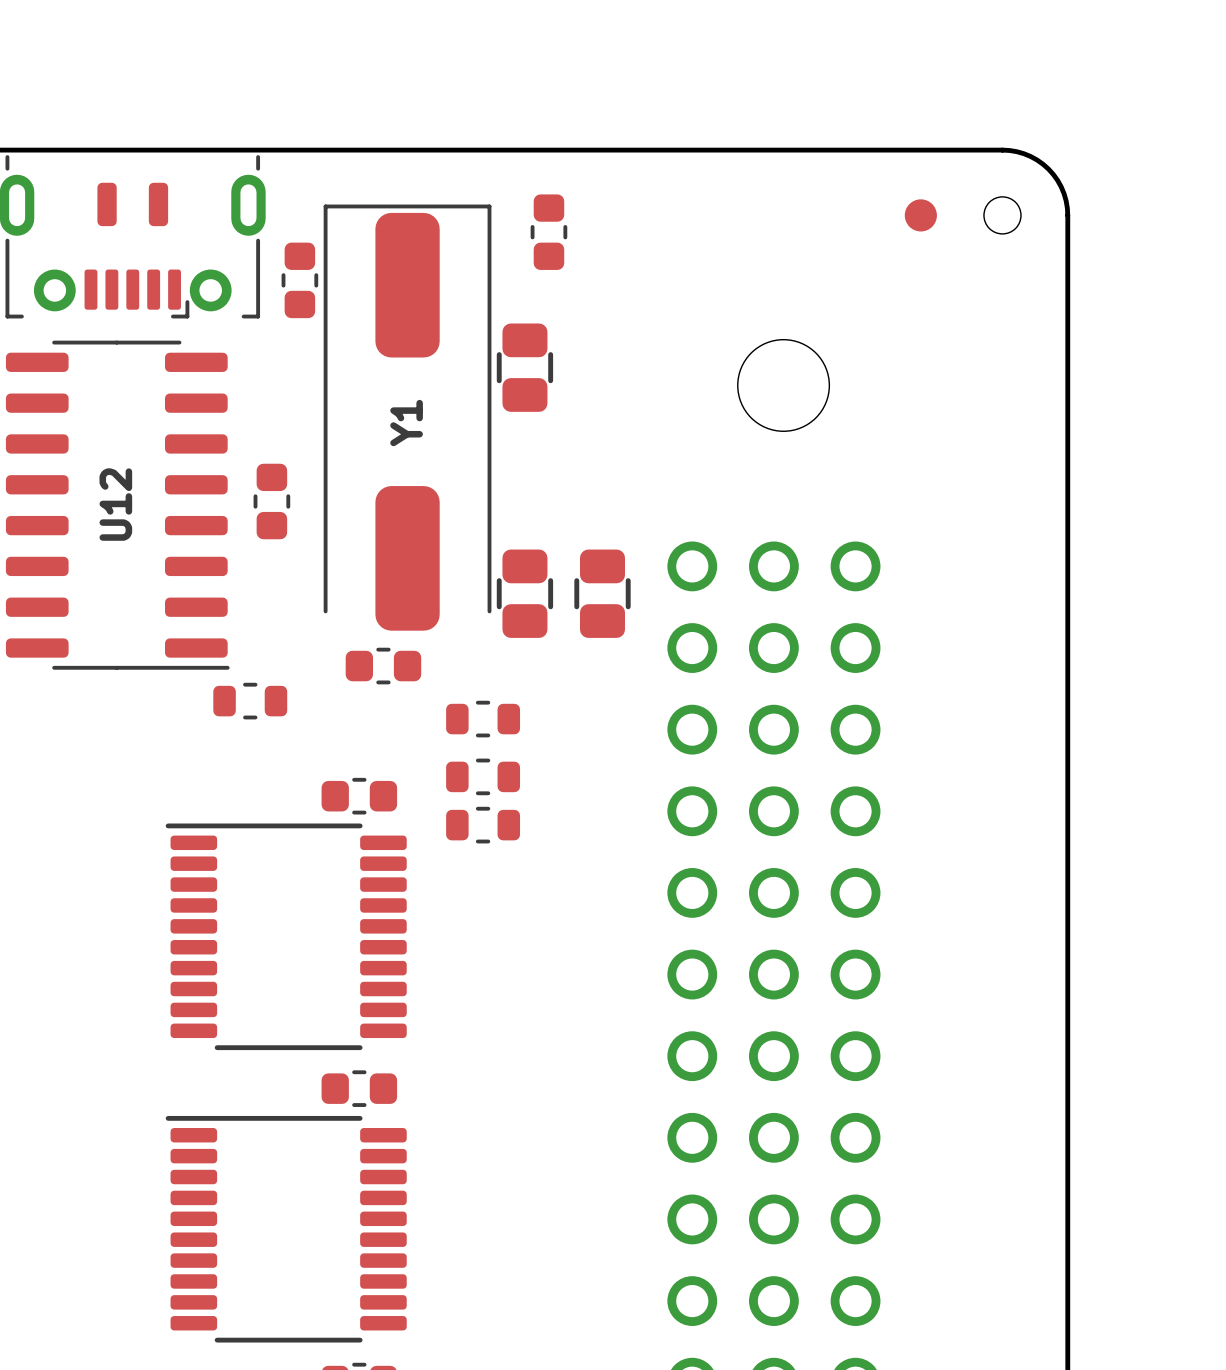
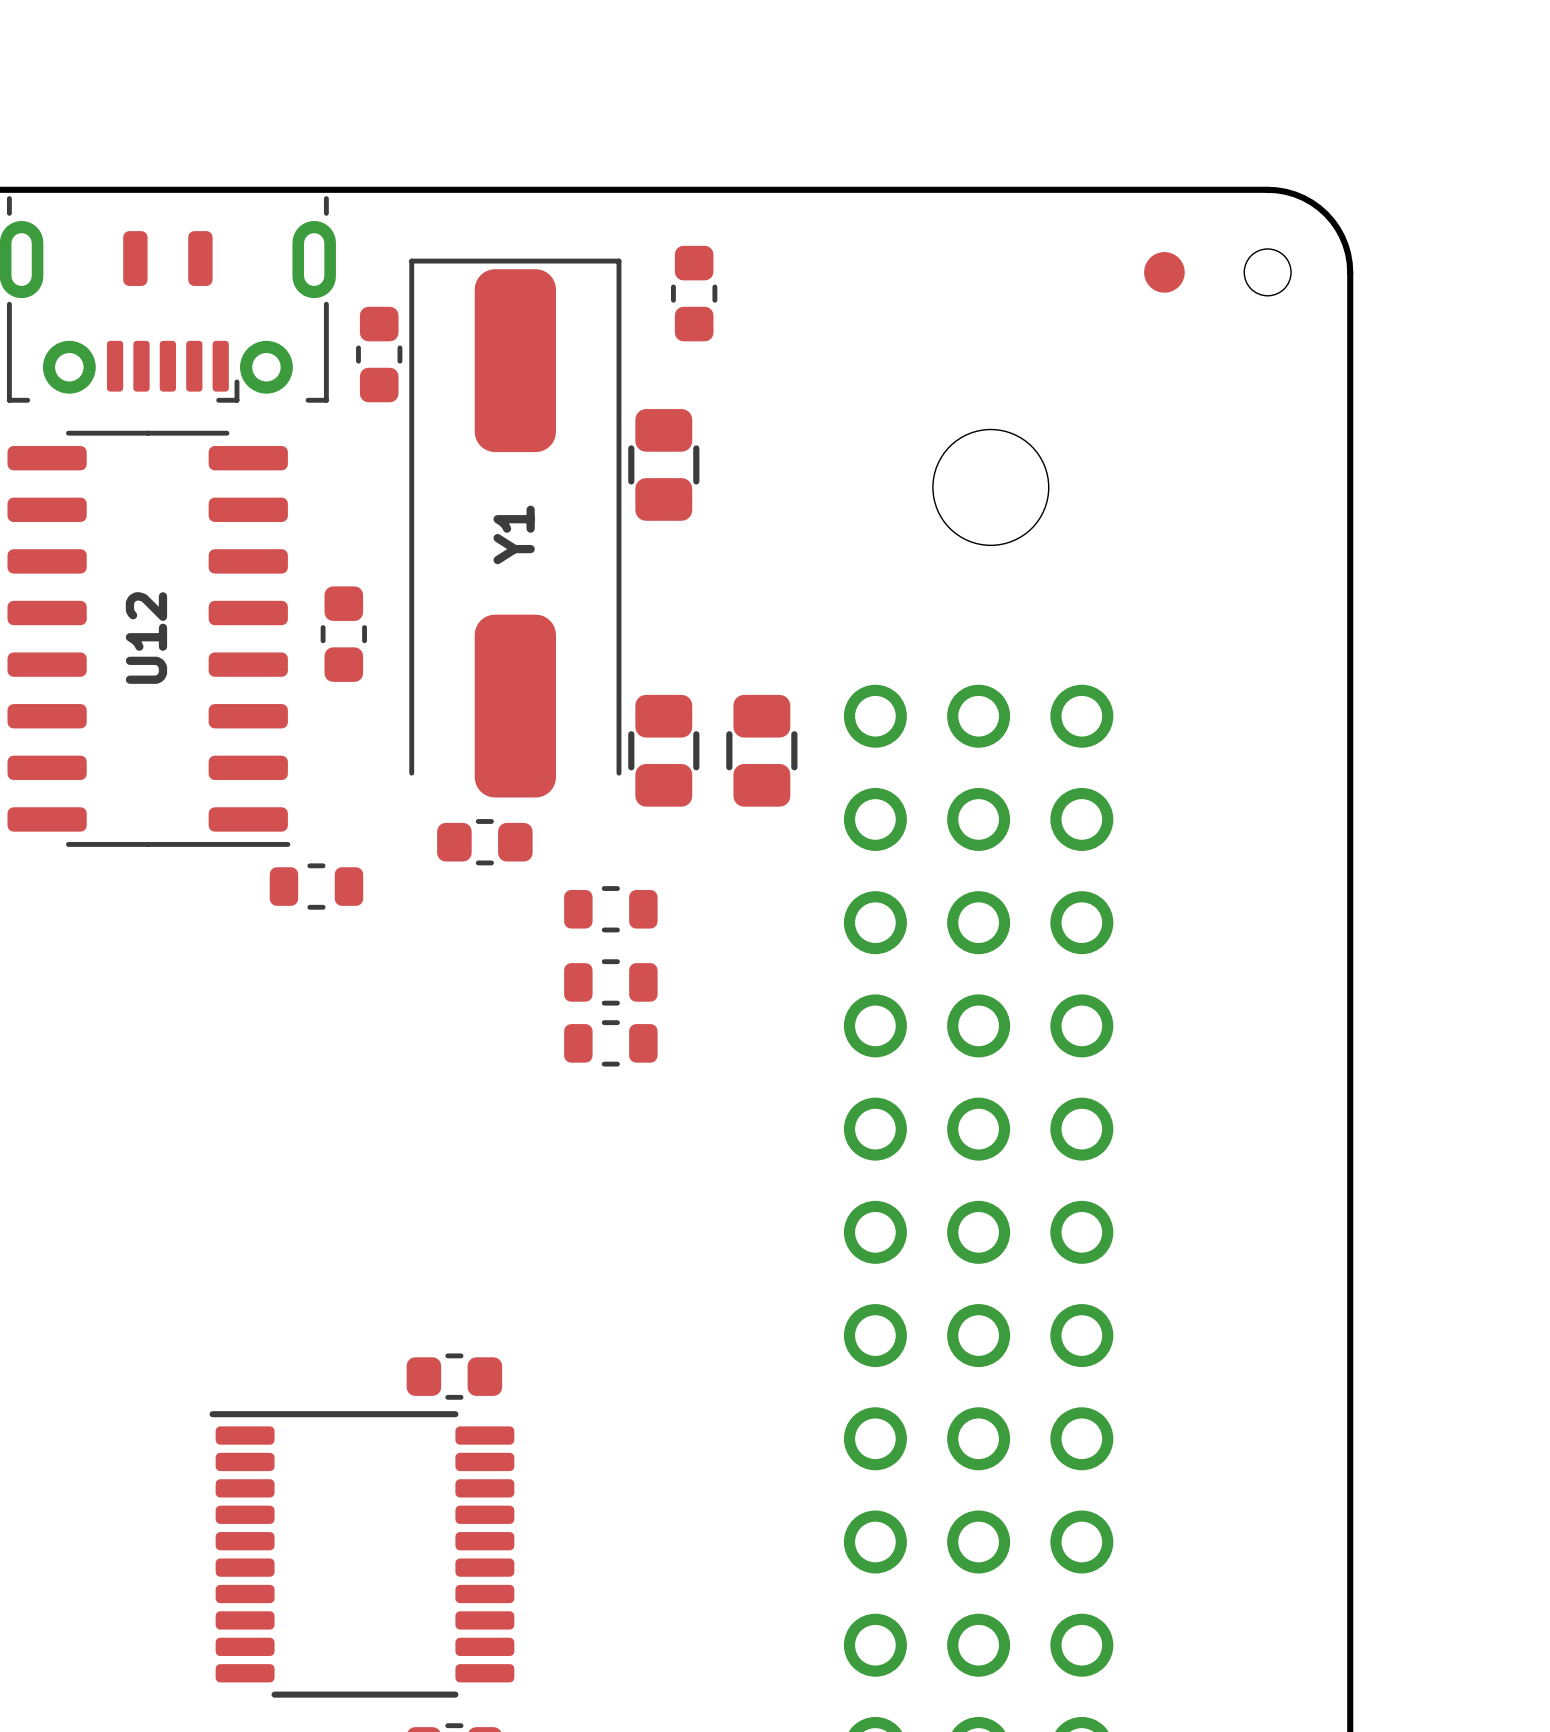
part: (359, 796) -> none
part: (286, 936) -> none

